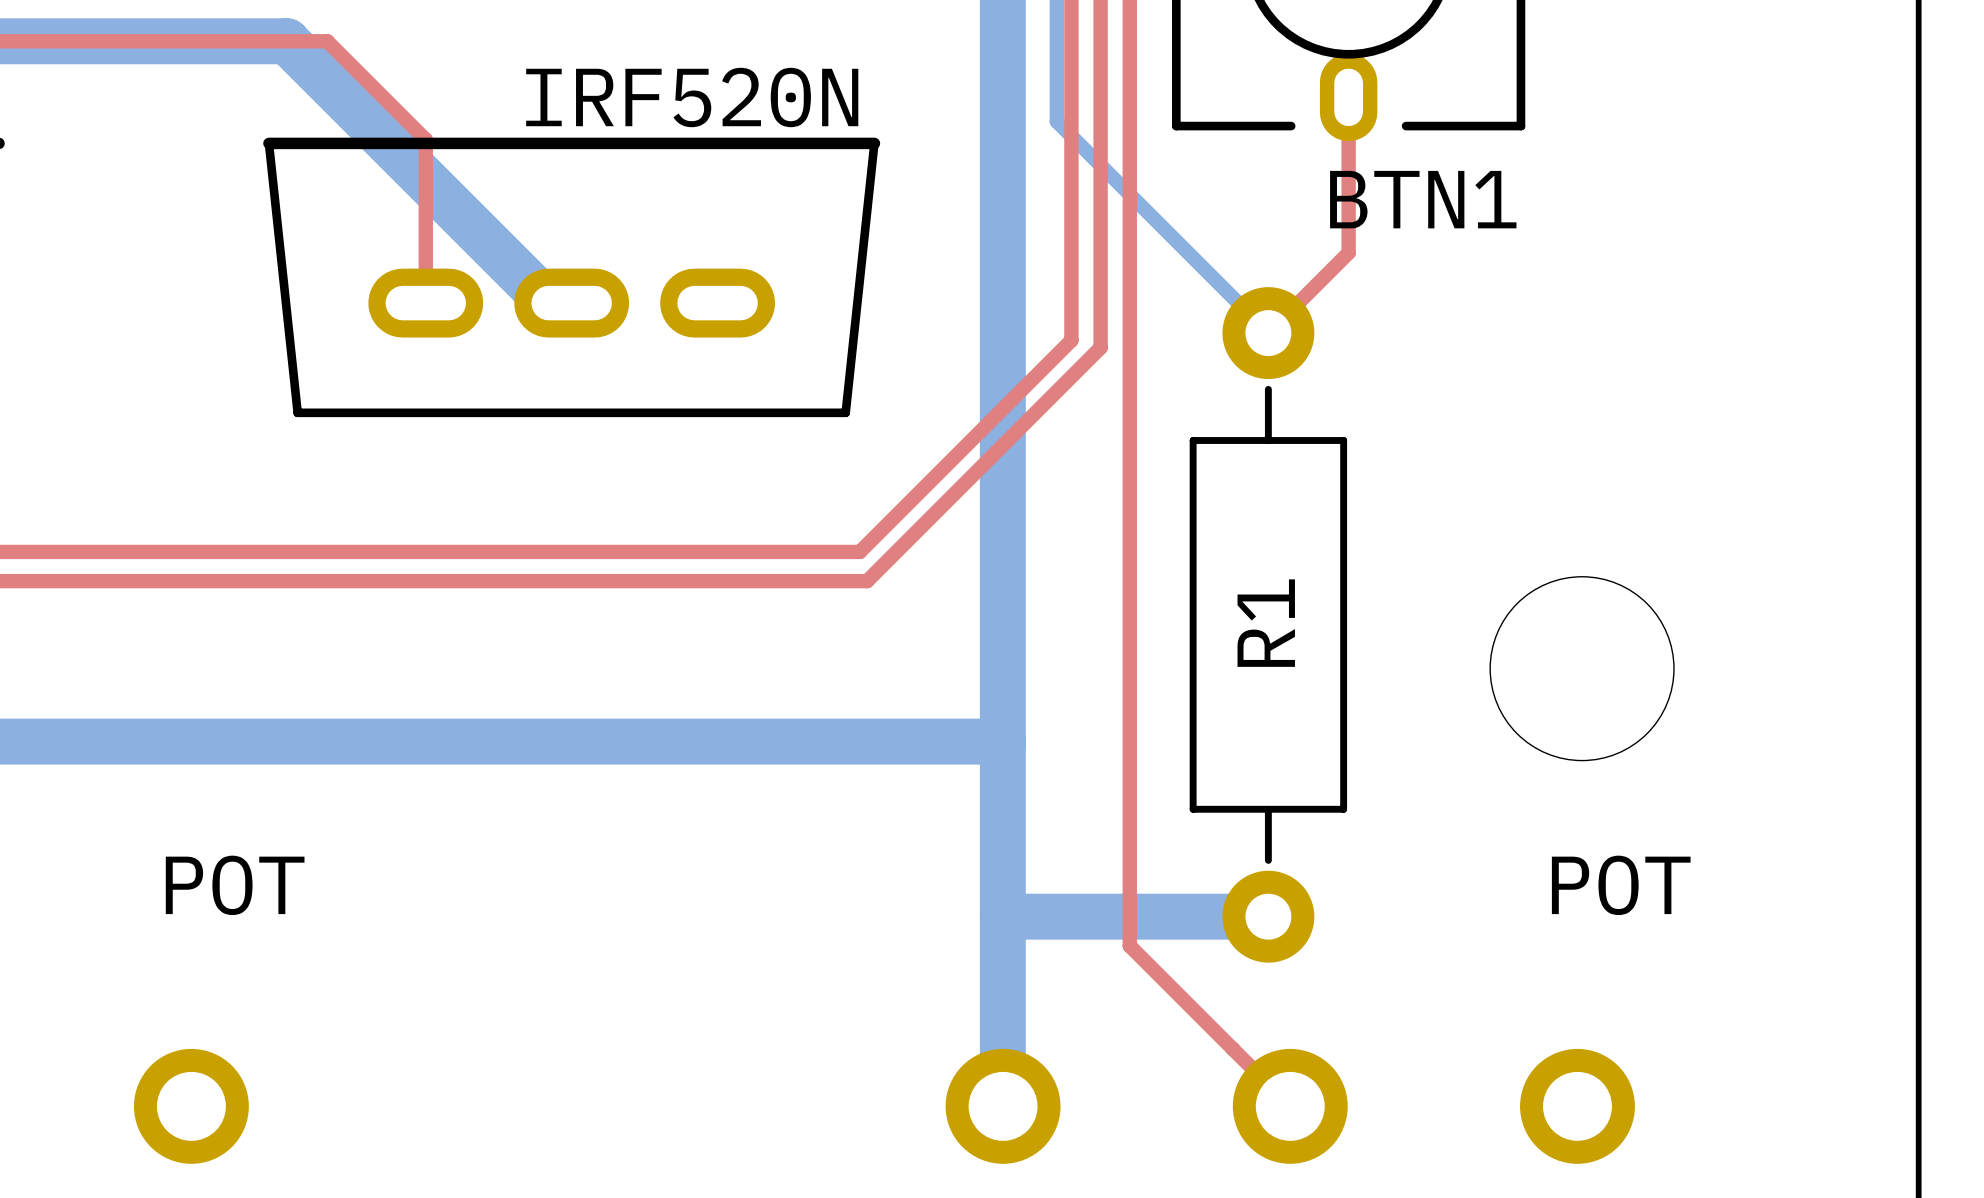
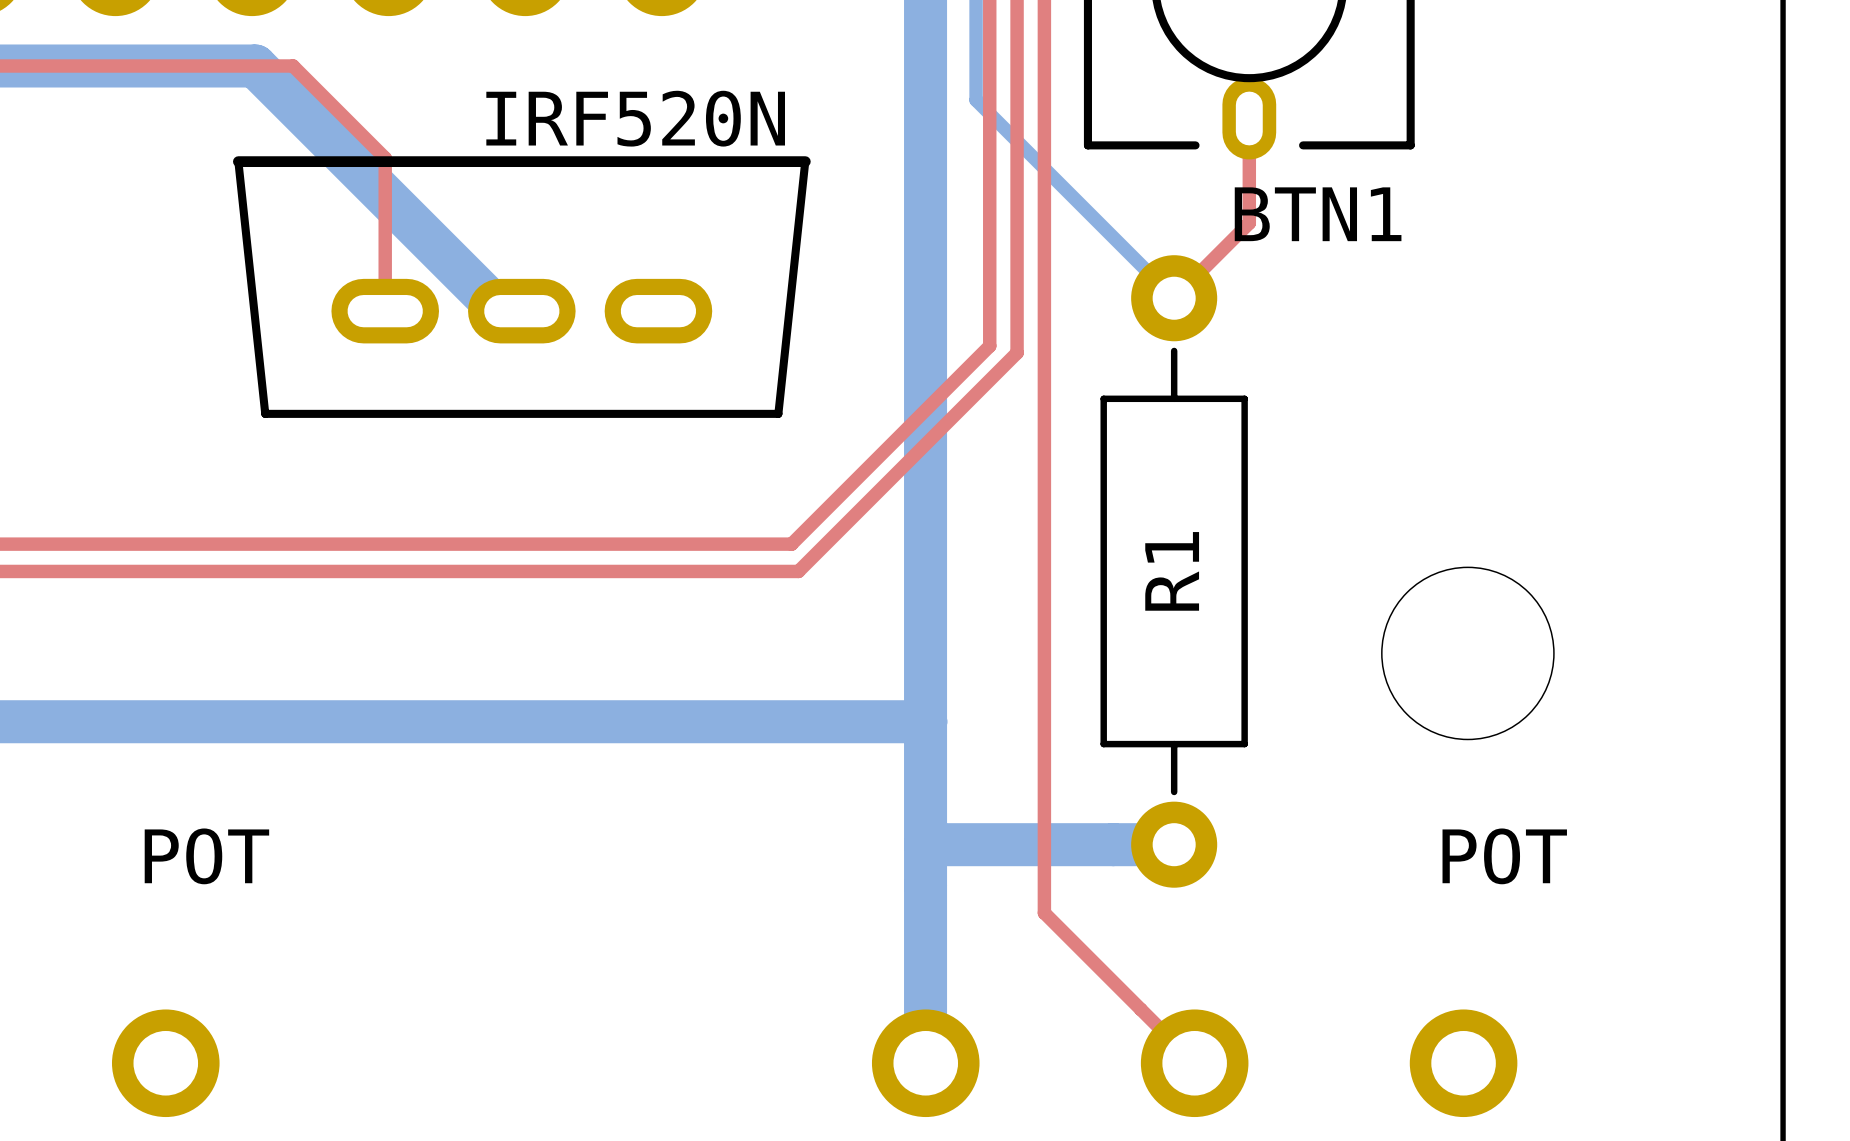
bottom track: (1056, 77) (1056, 121) (1268, 333) -> (976, 100) (1174, 298)
top track: (1348, 209) (1348, 252) (1268, 333) -> (1249, 223) (1174, 298)
R1 position: (1268, 624) -> (1174, 571)
bottom track: (1002, 916) (1268, 916) -> (925, 844) (1174, 844)

